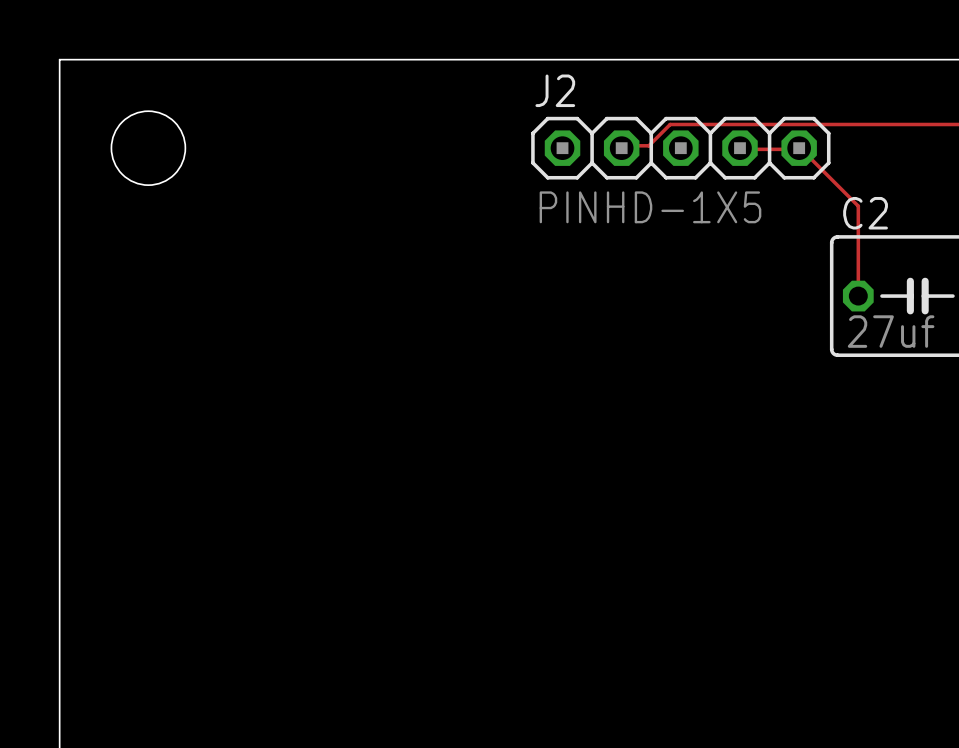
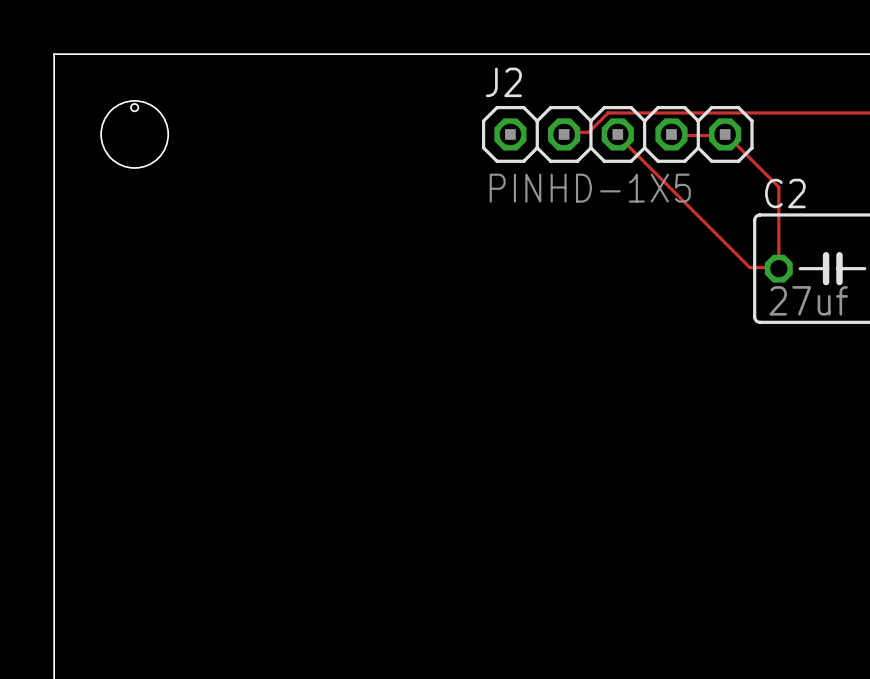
hole: none -> (134, 107)
track: none -> (617, 134) (749, 267) (778, 267)

